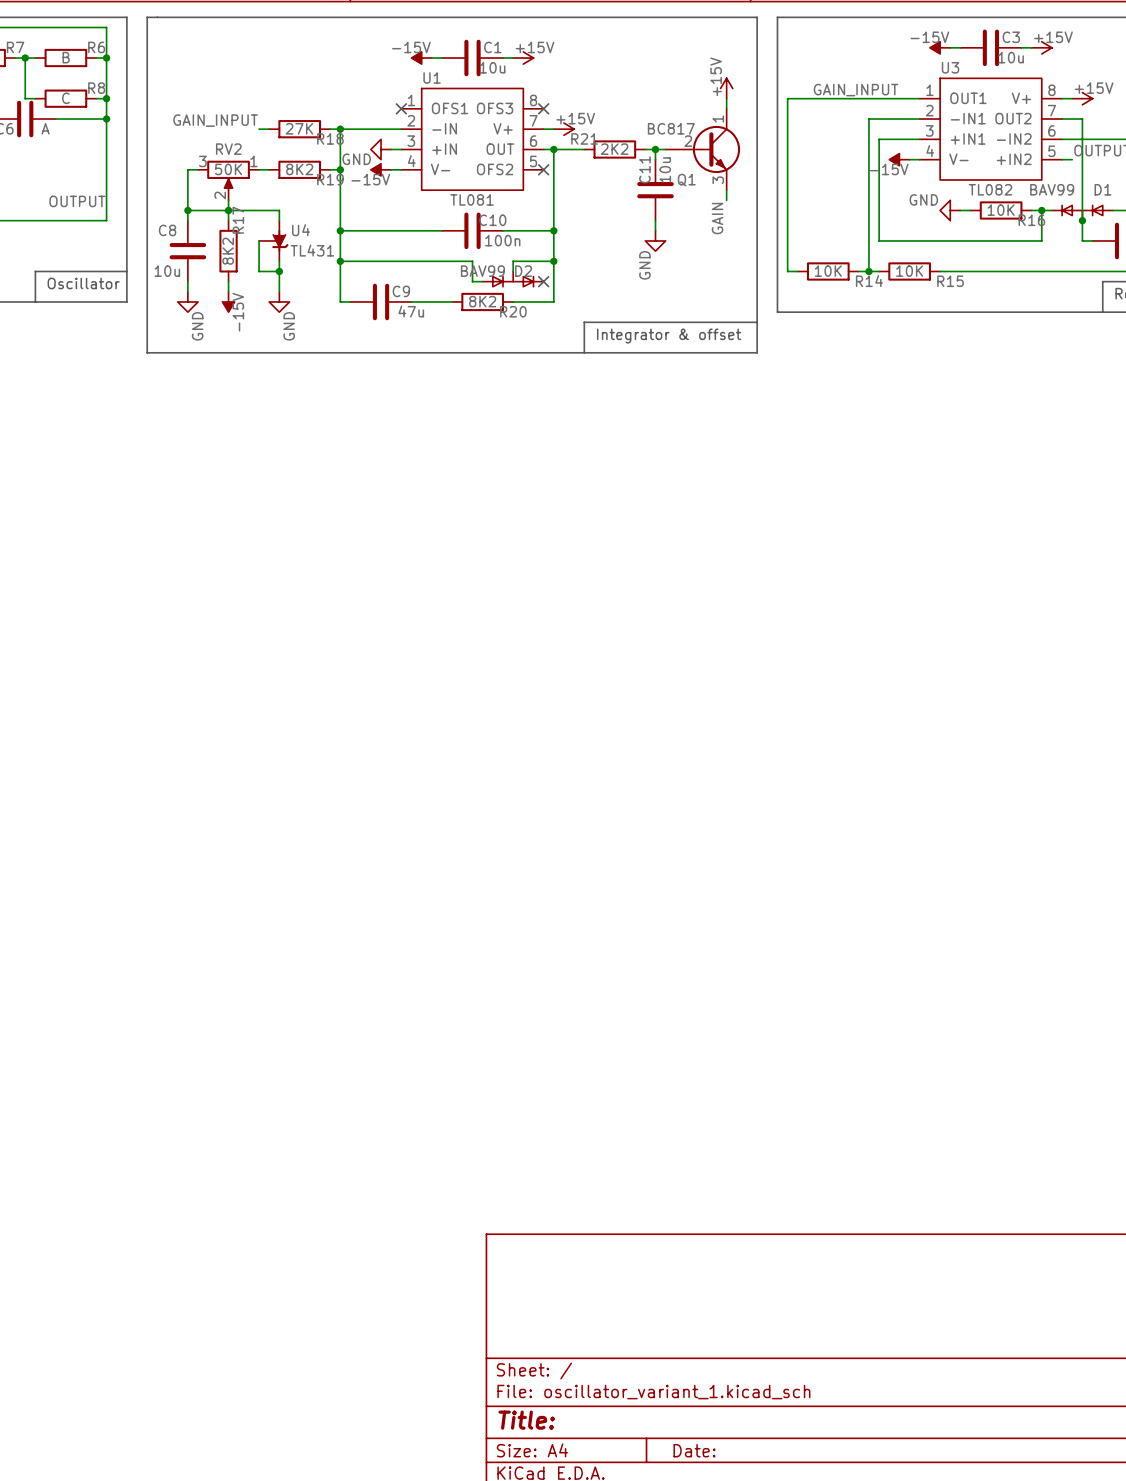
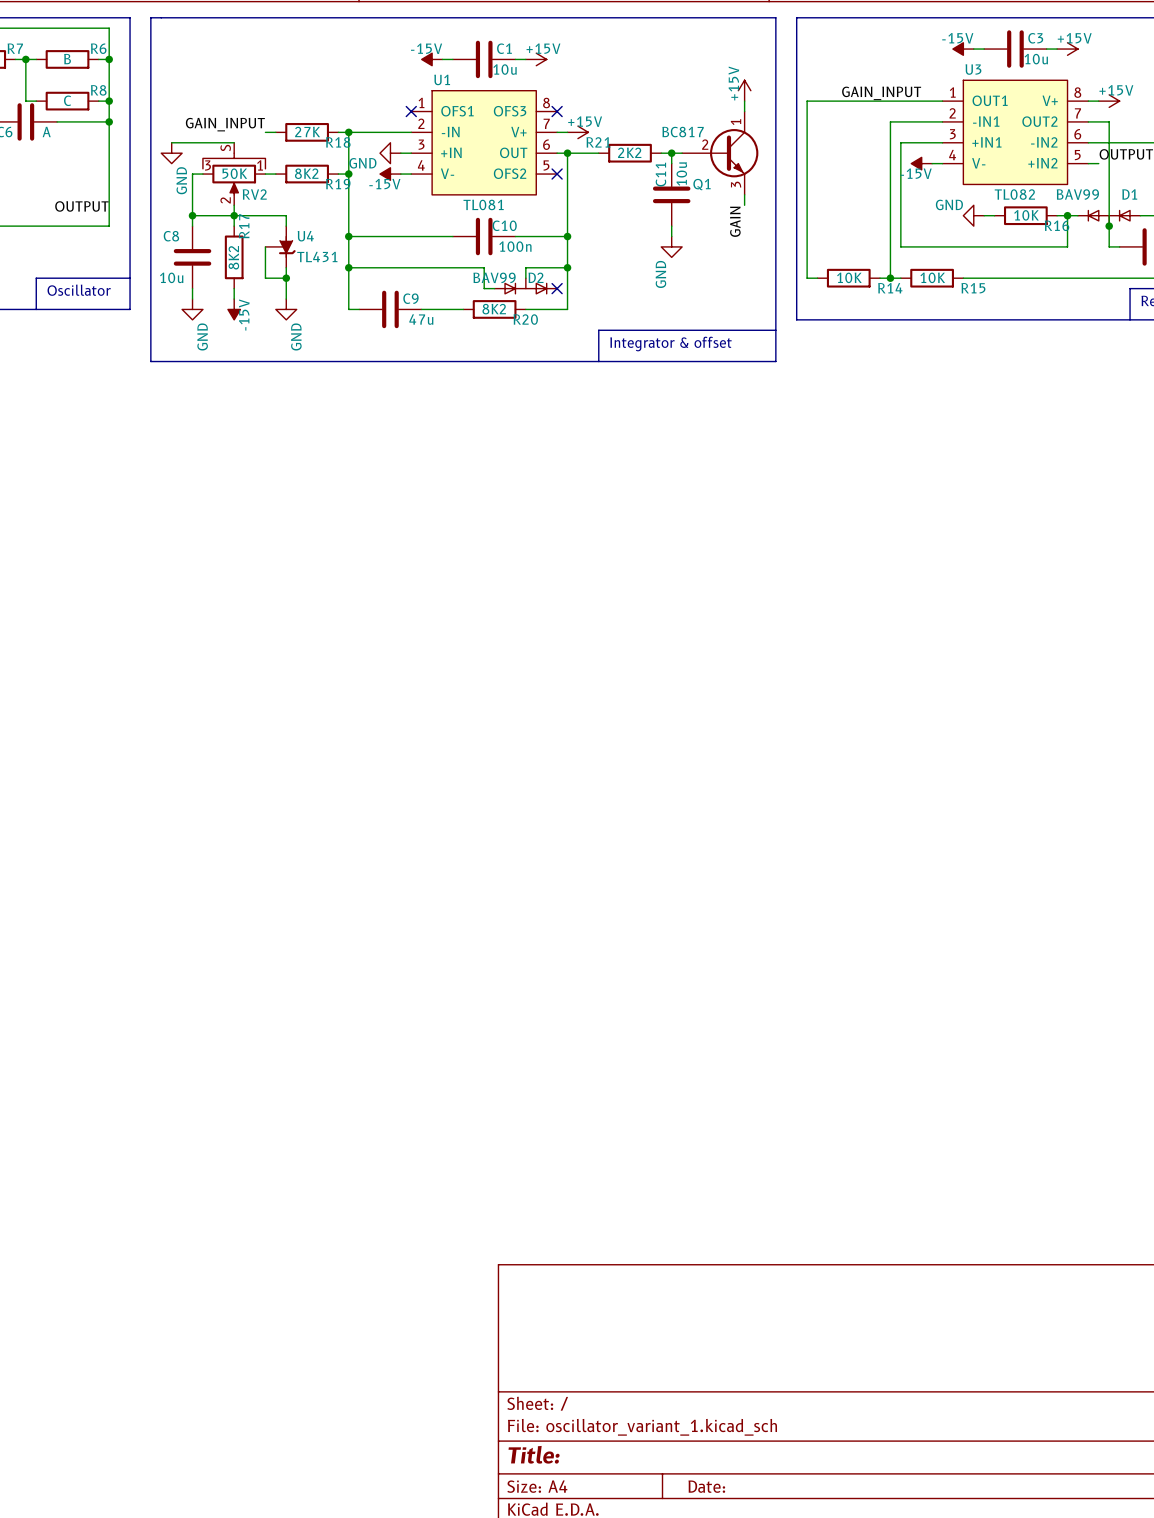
wire: none -> (171, 142) (234, 142)
power symbol: none -> GND (171, 153)
RV2 name position: RV2 (228, 149) -> RV2 (254, 194)
RV2 symbol: [198, 160, 260, 201] -> [202, 142, 266, 206]

